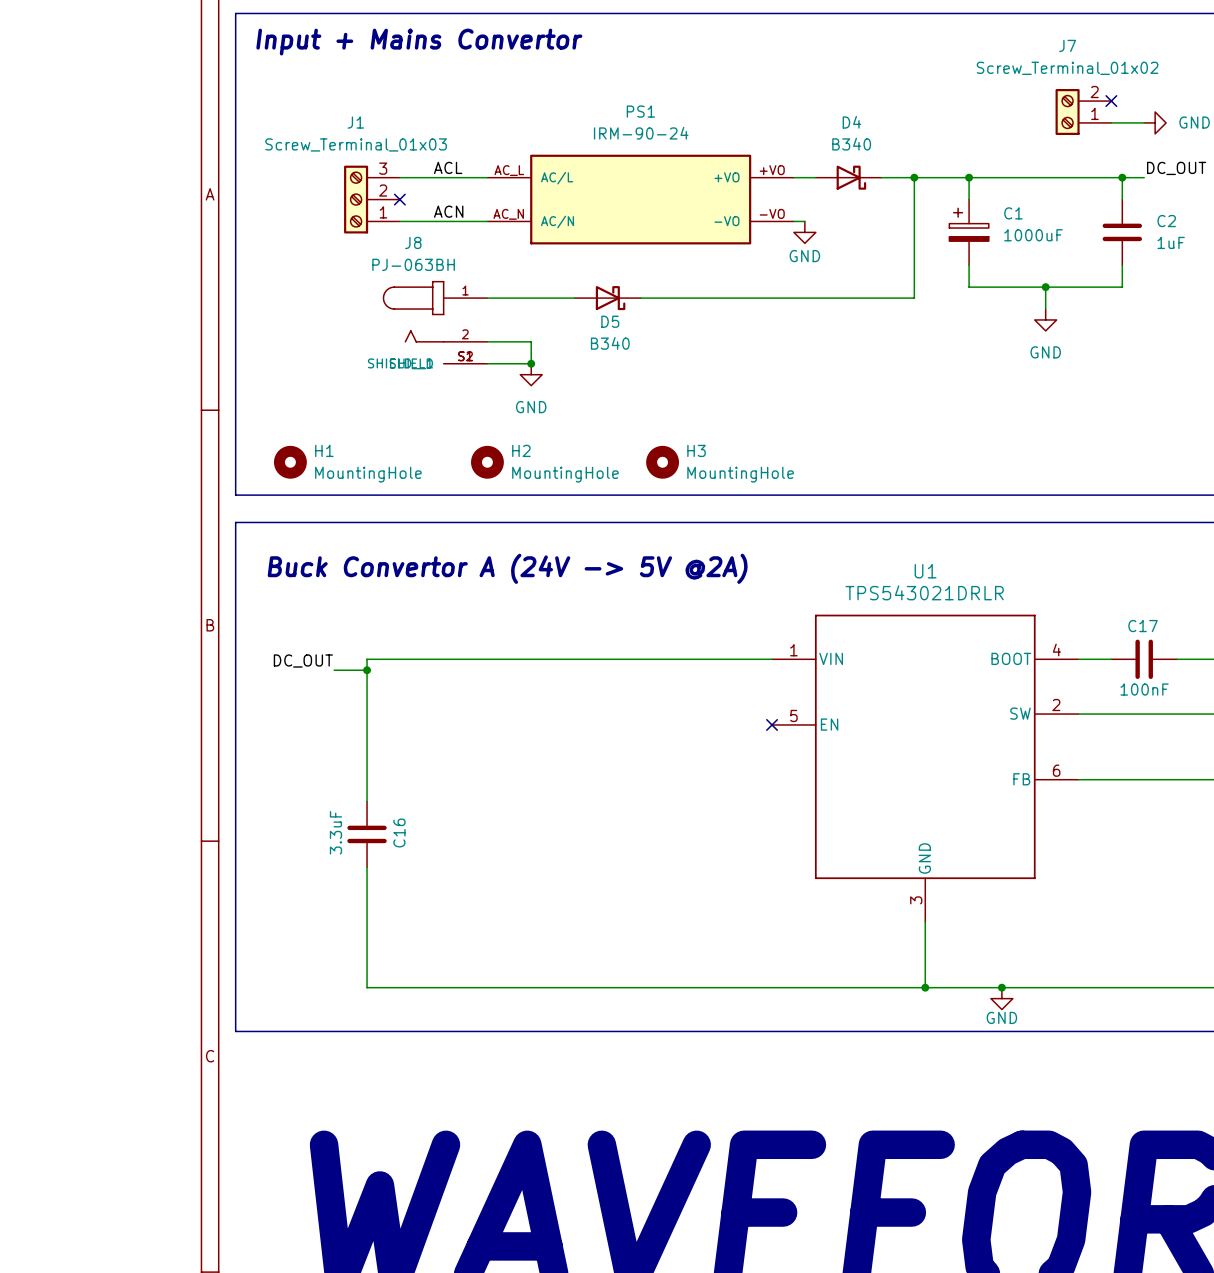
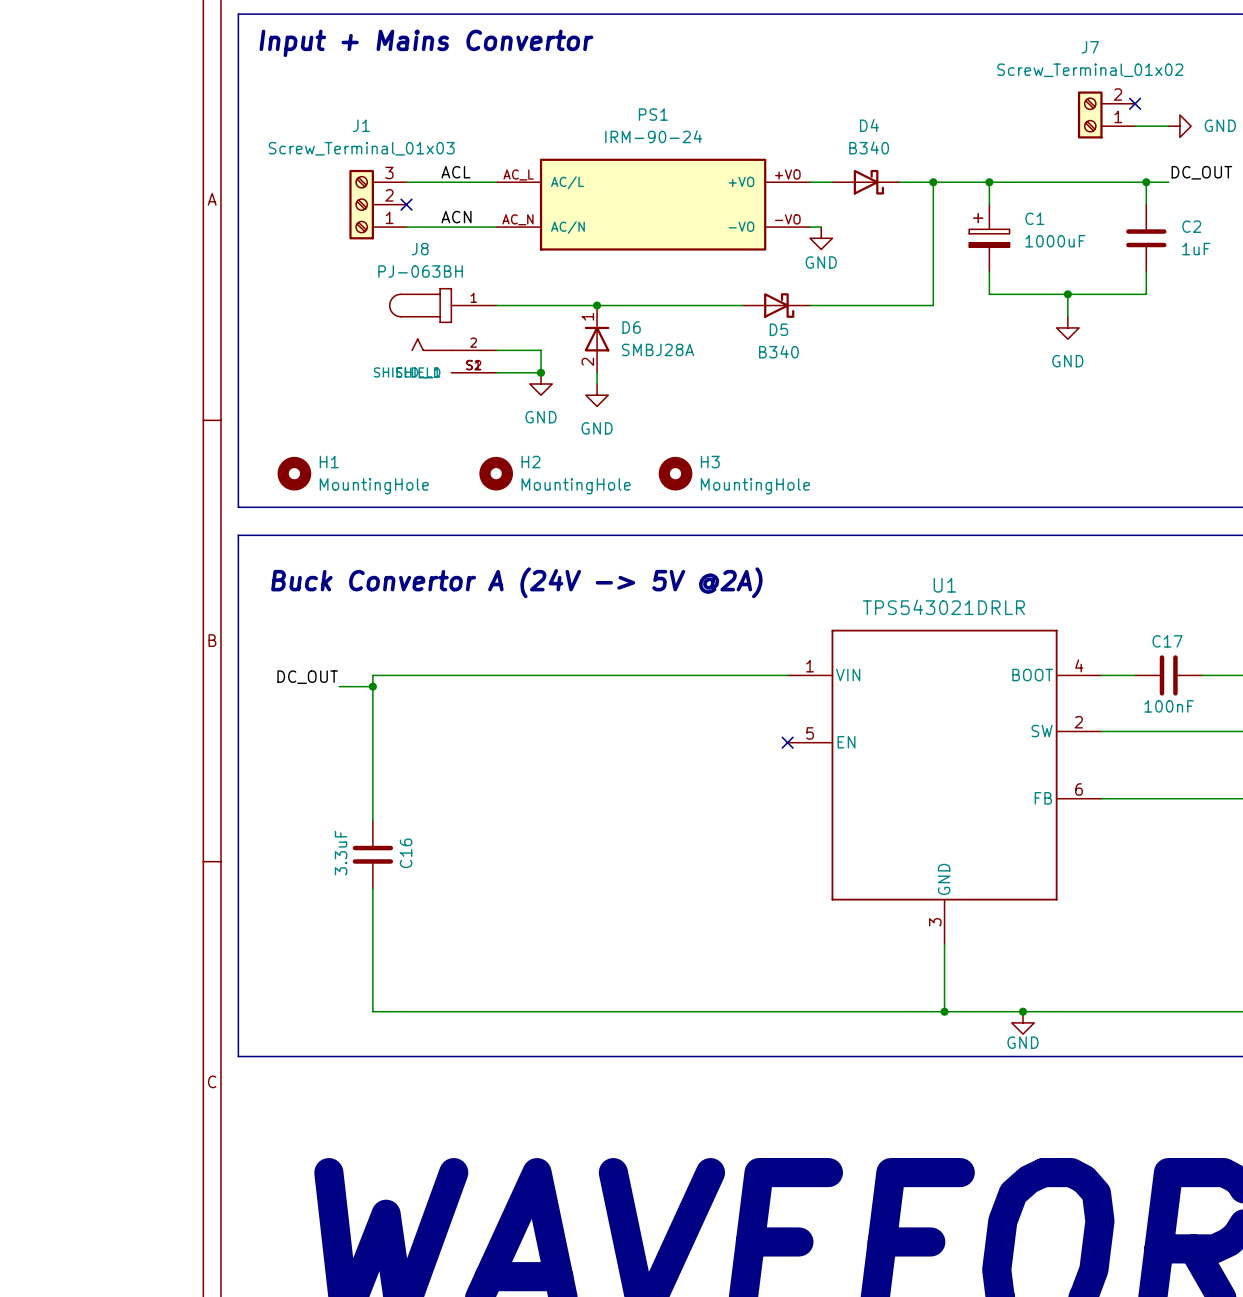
junction: none -> (597, 305)
D5 position: (607, 298) -> (776, 305)
D6: none -> SMBJ28A (597, 339)
wire: none -> (597, 372) (597, 383)
power symbol: none -> GND (597, 395)

